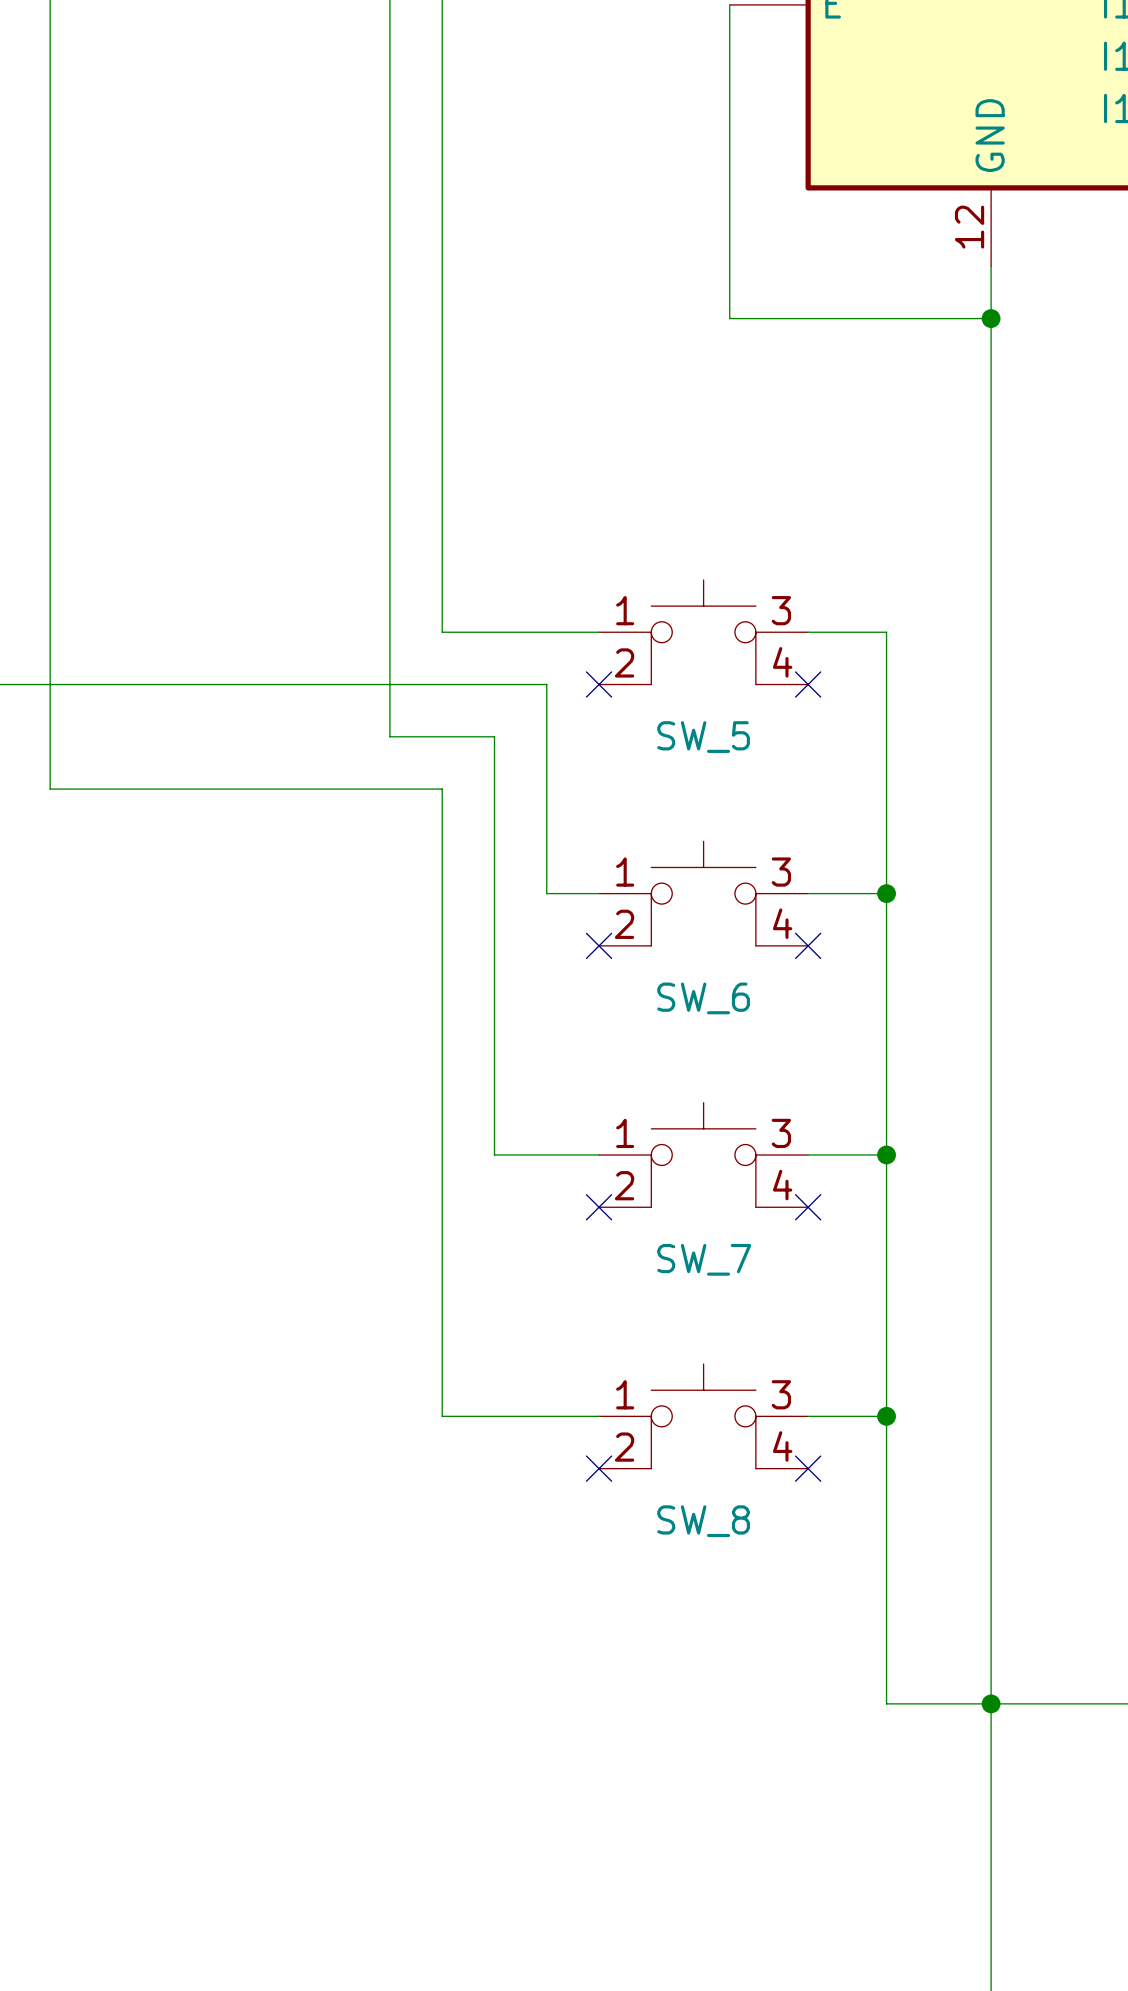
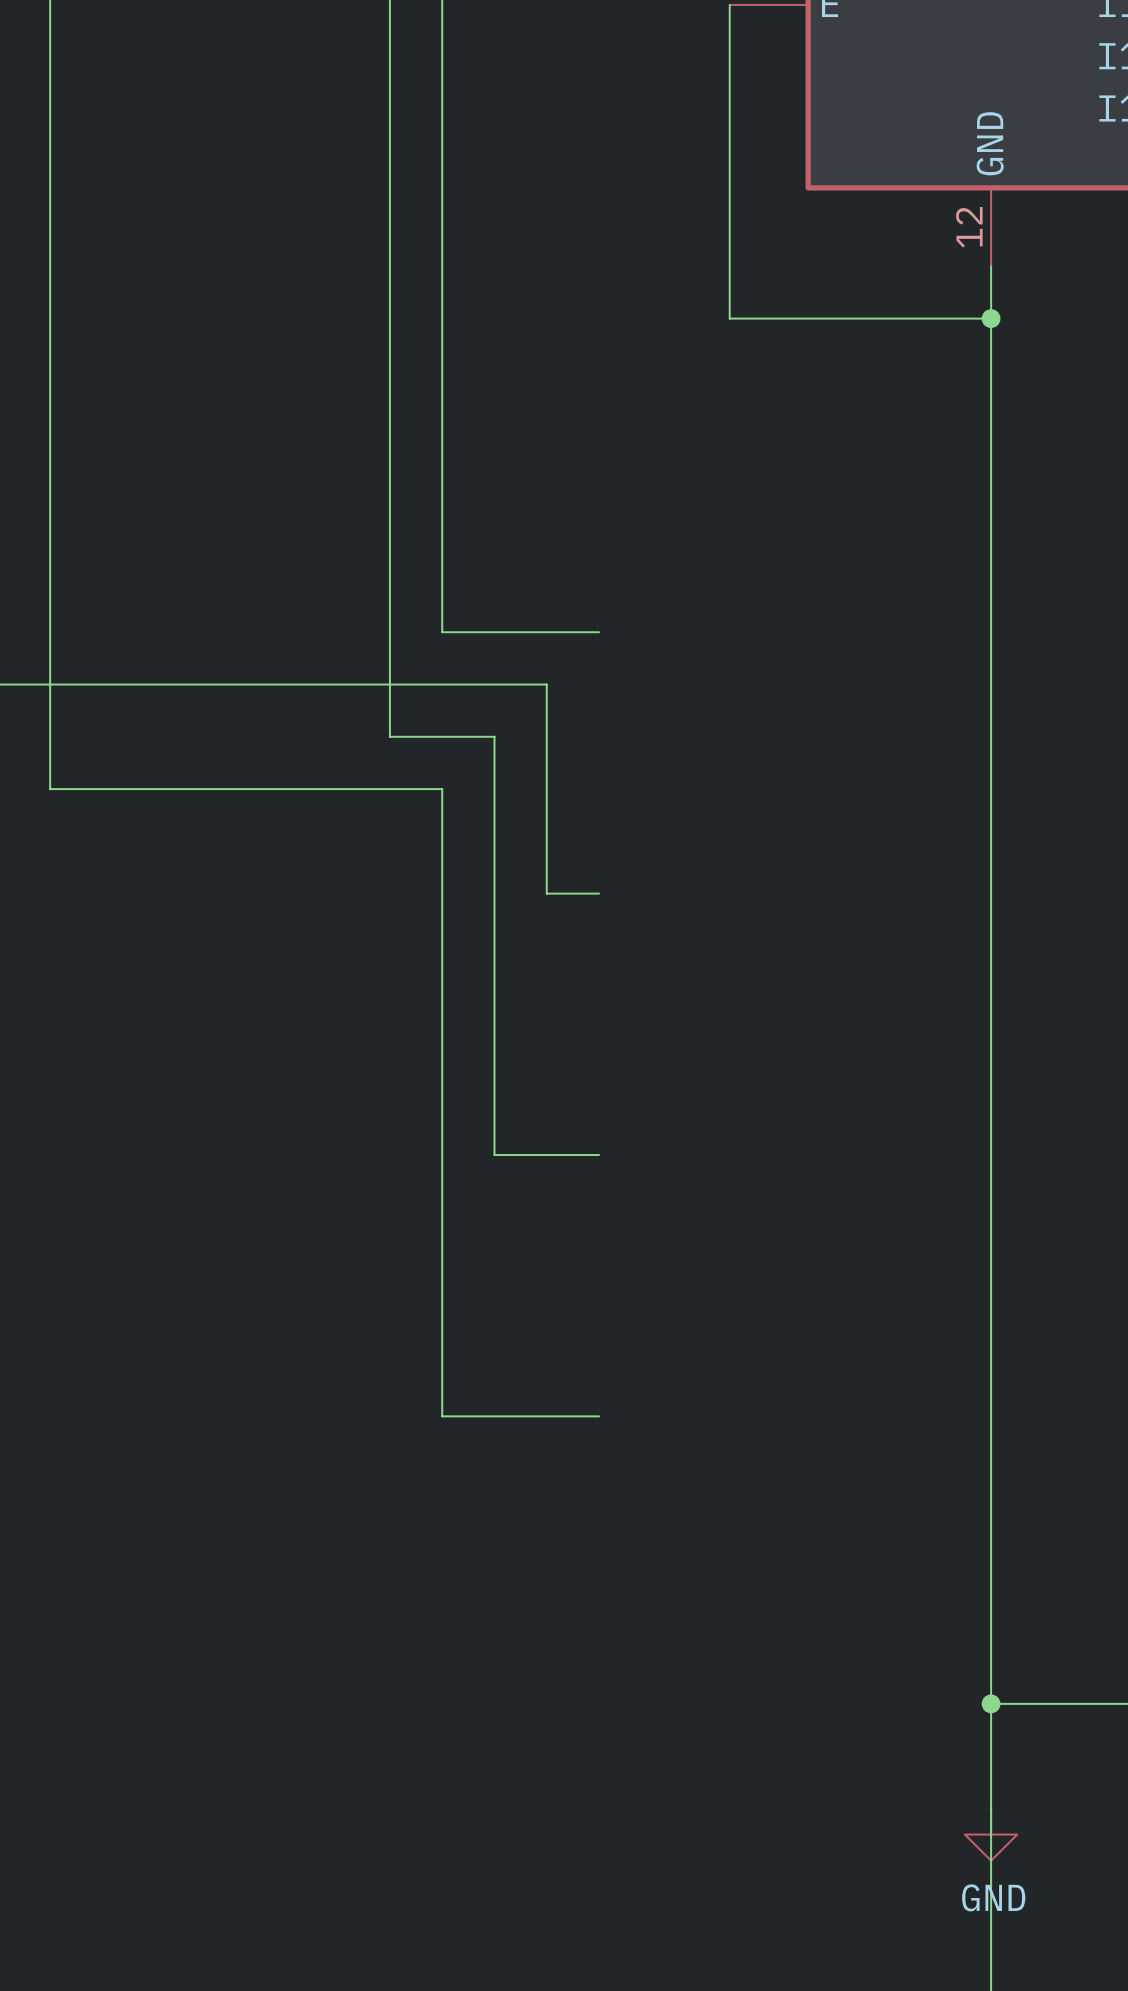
SW_5: (703, 632) -> none
wire: (808, 632) (886, 632) (886, 1703) (991, 1703) -> none
no-connect mark: (599, 684) -> none
no-connect mark: (808, 684) -> none
SW_6: (703, 893) -> none
wire: (808, 893) (886, 893) -> none
junction: (886, 893) -> none
no-connect mark: (599, 945) -> none
no-connect mark: (808, 945) -> none
SW_7: (703, 1154) -> none
wire: (808, 1154) (886, 1154) -> none
junction: (886, 1154) -> none
no-connect mark: (599, 1207) -> none
no-connect mark: (808, 1207) -> none
SW_8: (703, 1416) -> none
wire: (808, 1416) (886, 1416) -> none
junction: (886, 1416) -> none
no-connect mark: (599, 1468) -> none
no-connect mark: (808, 1468) -> none
power symbol: none -> GND (991, 1834)

